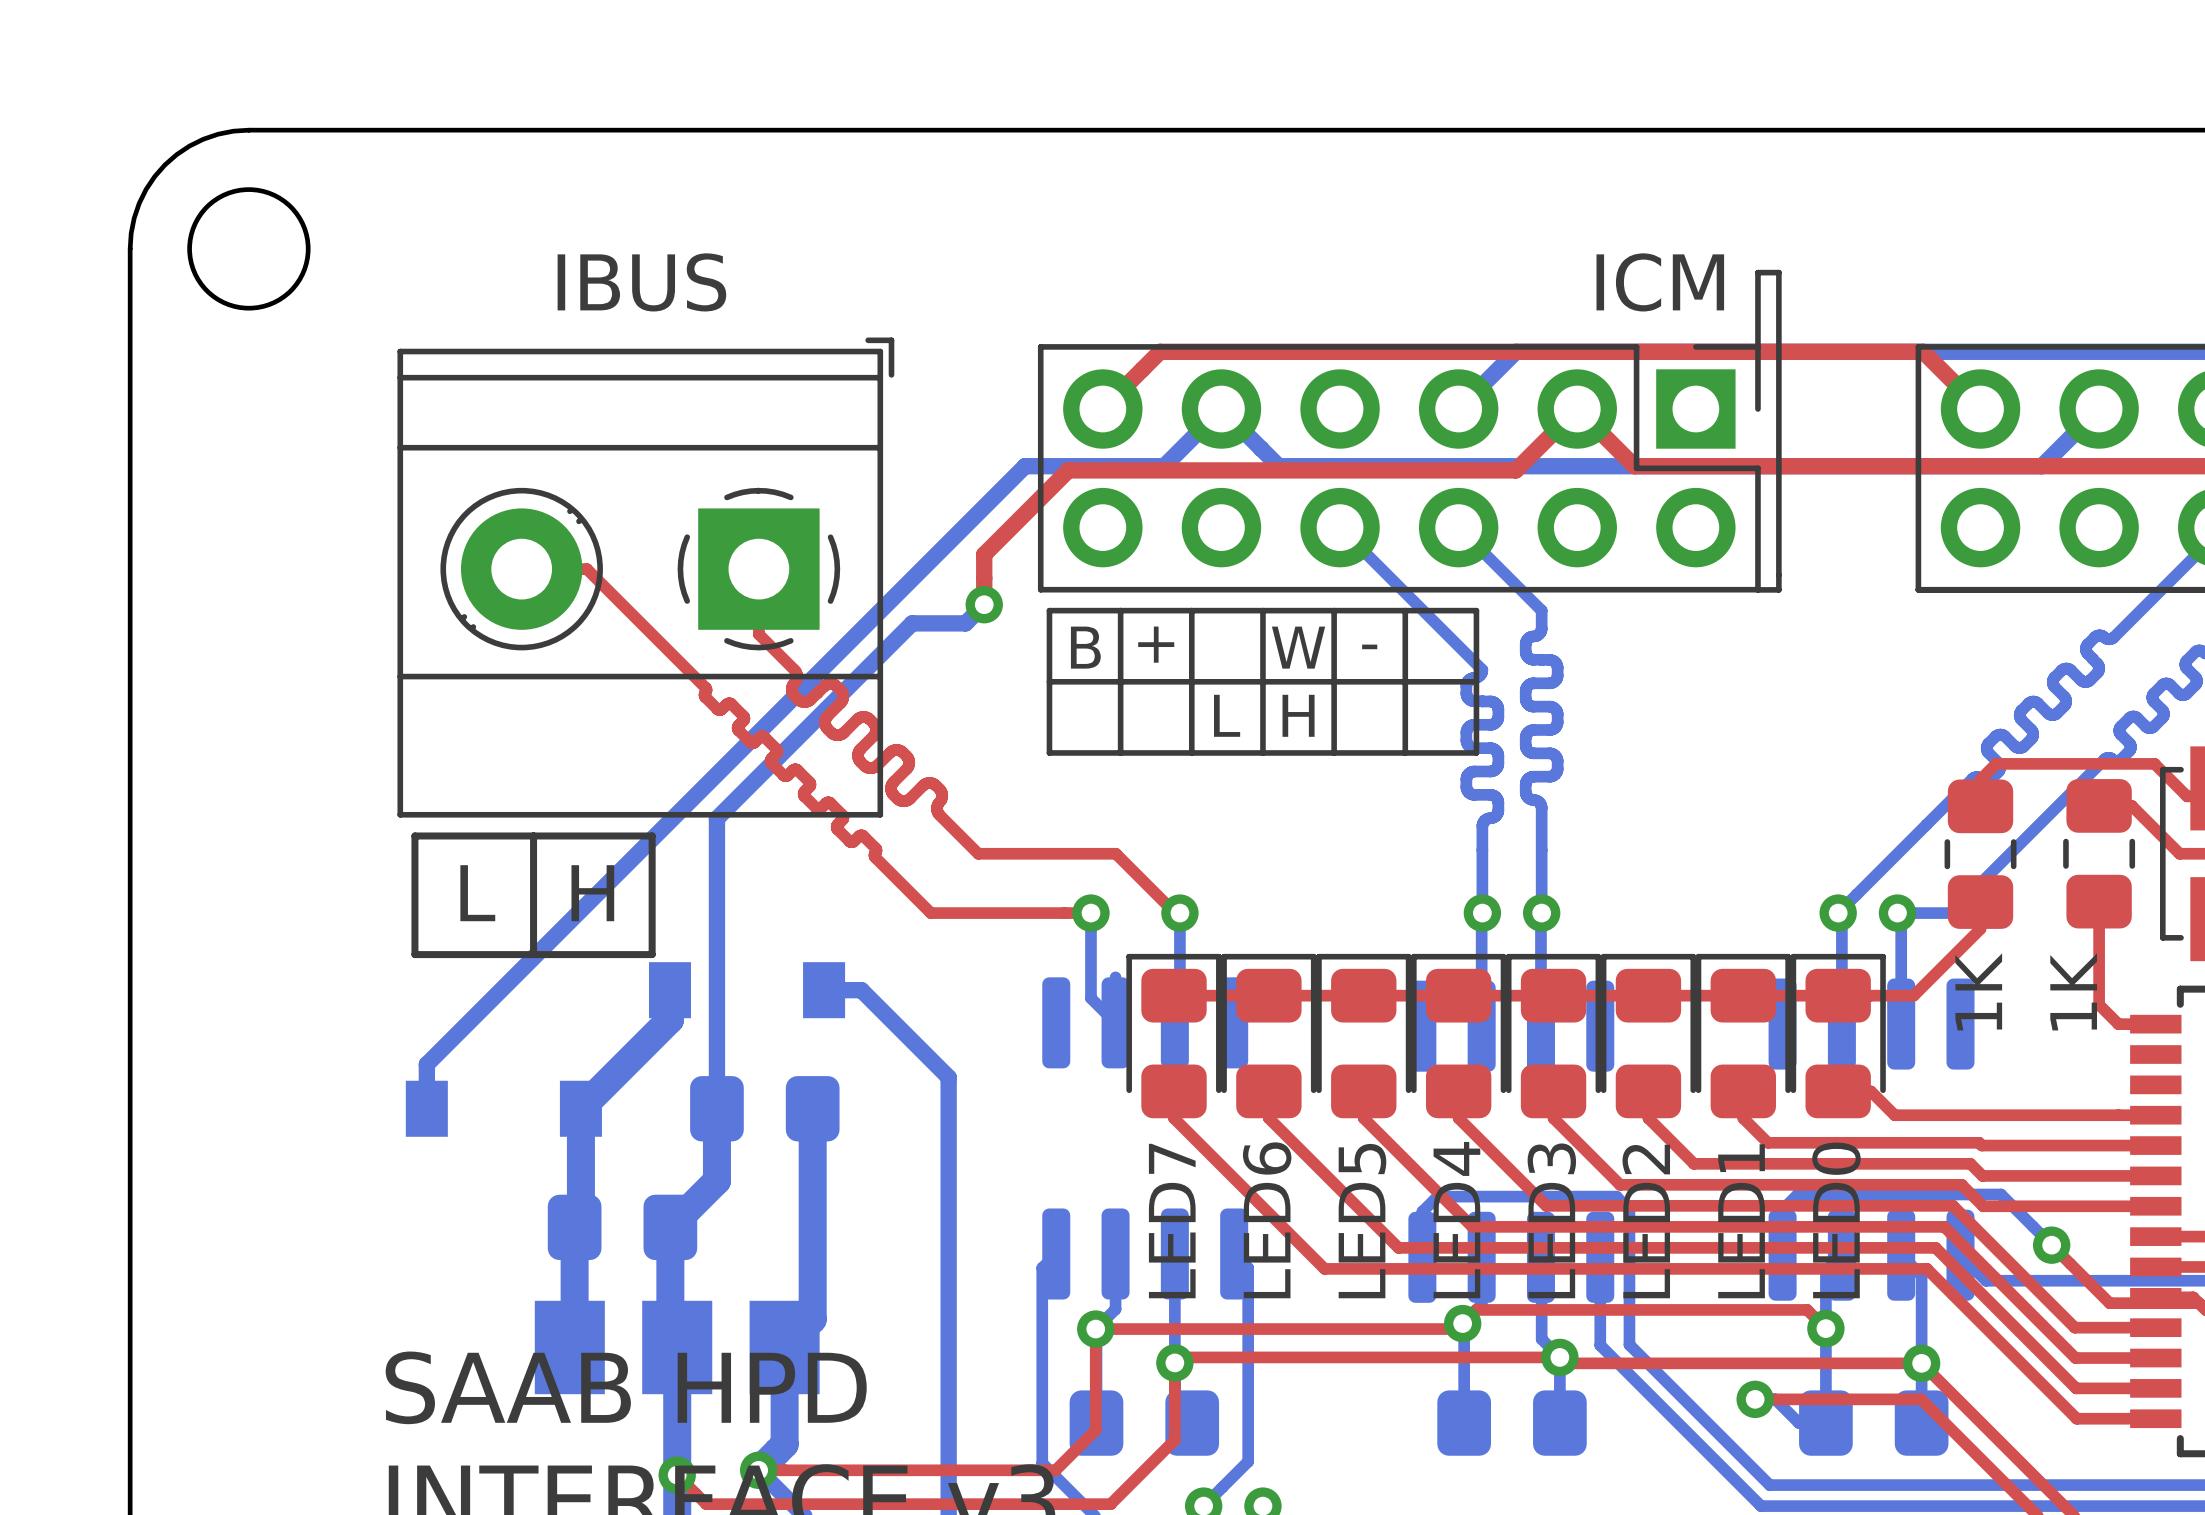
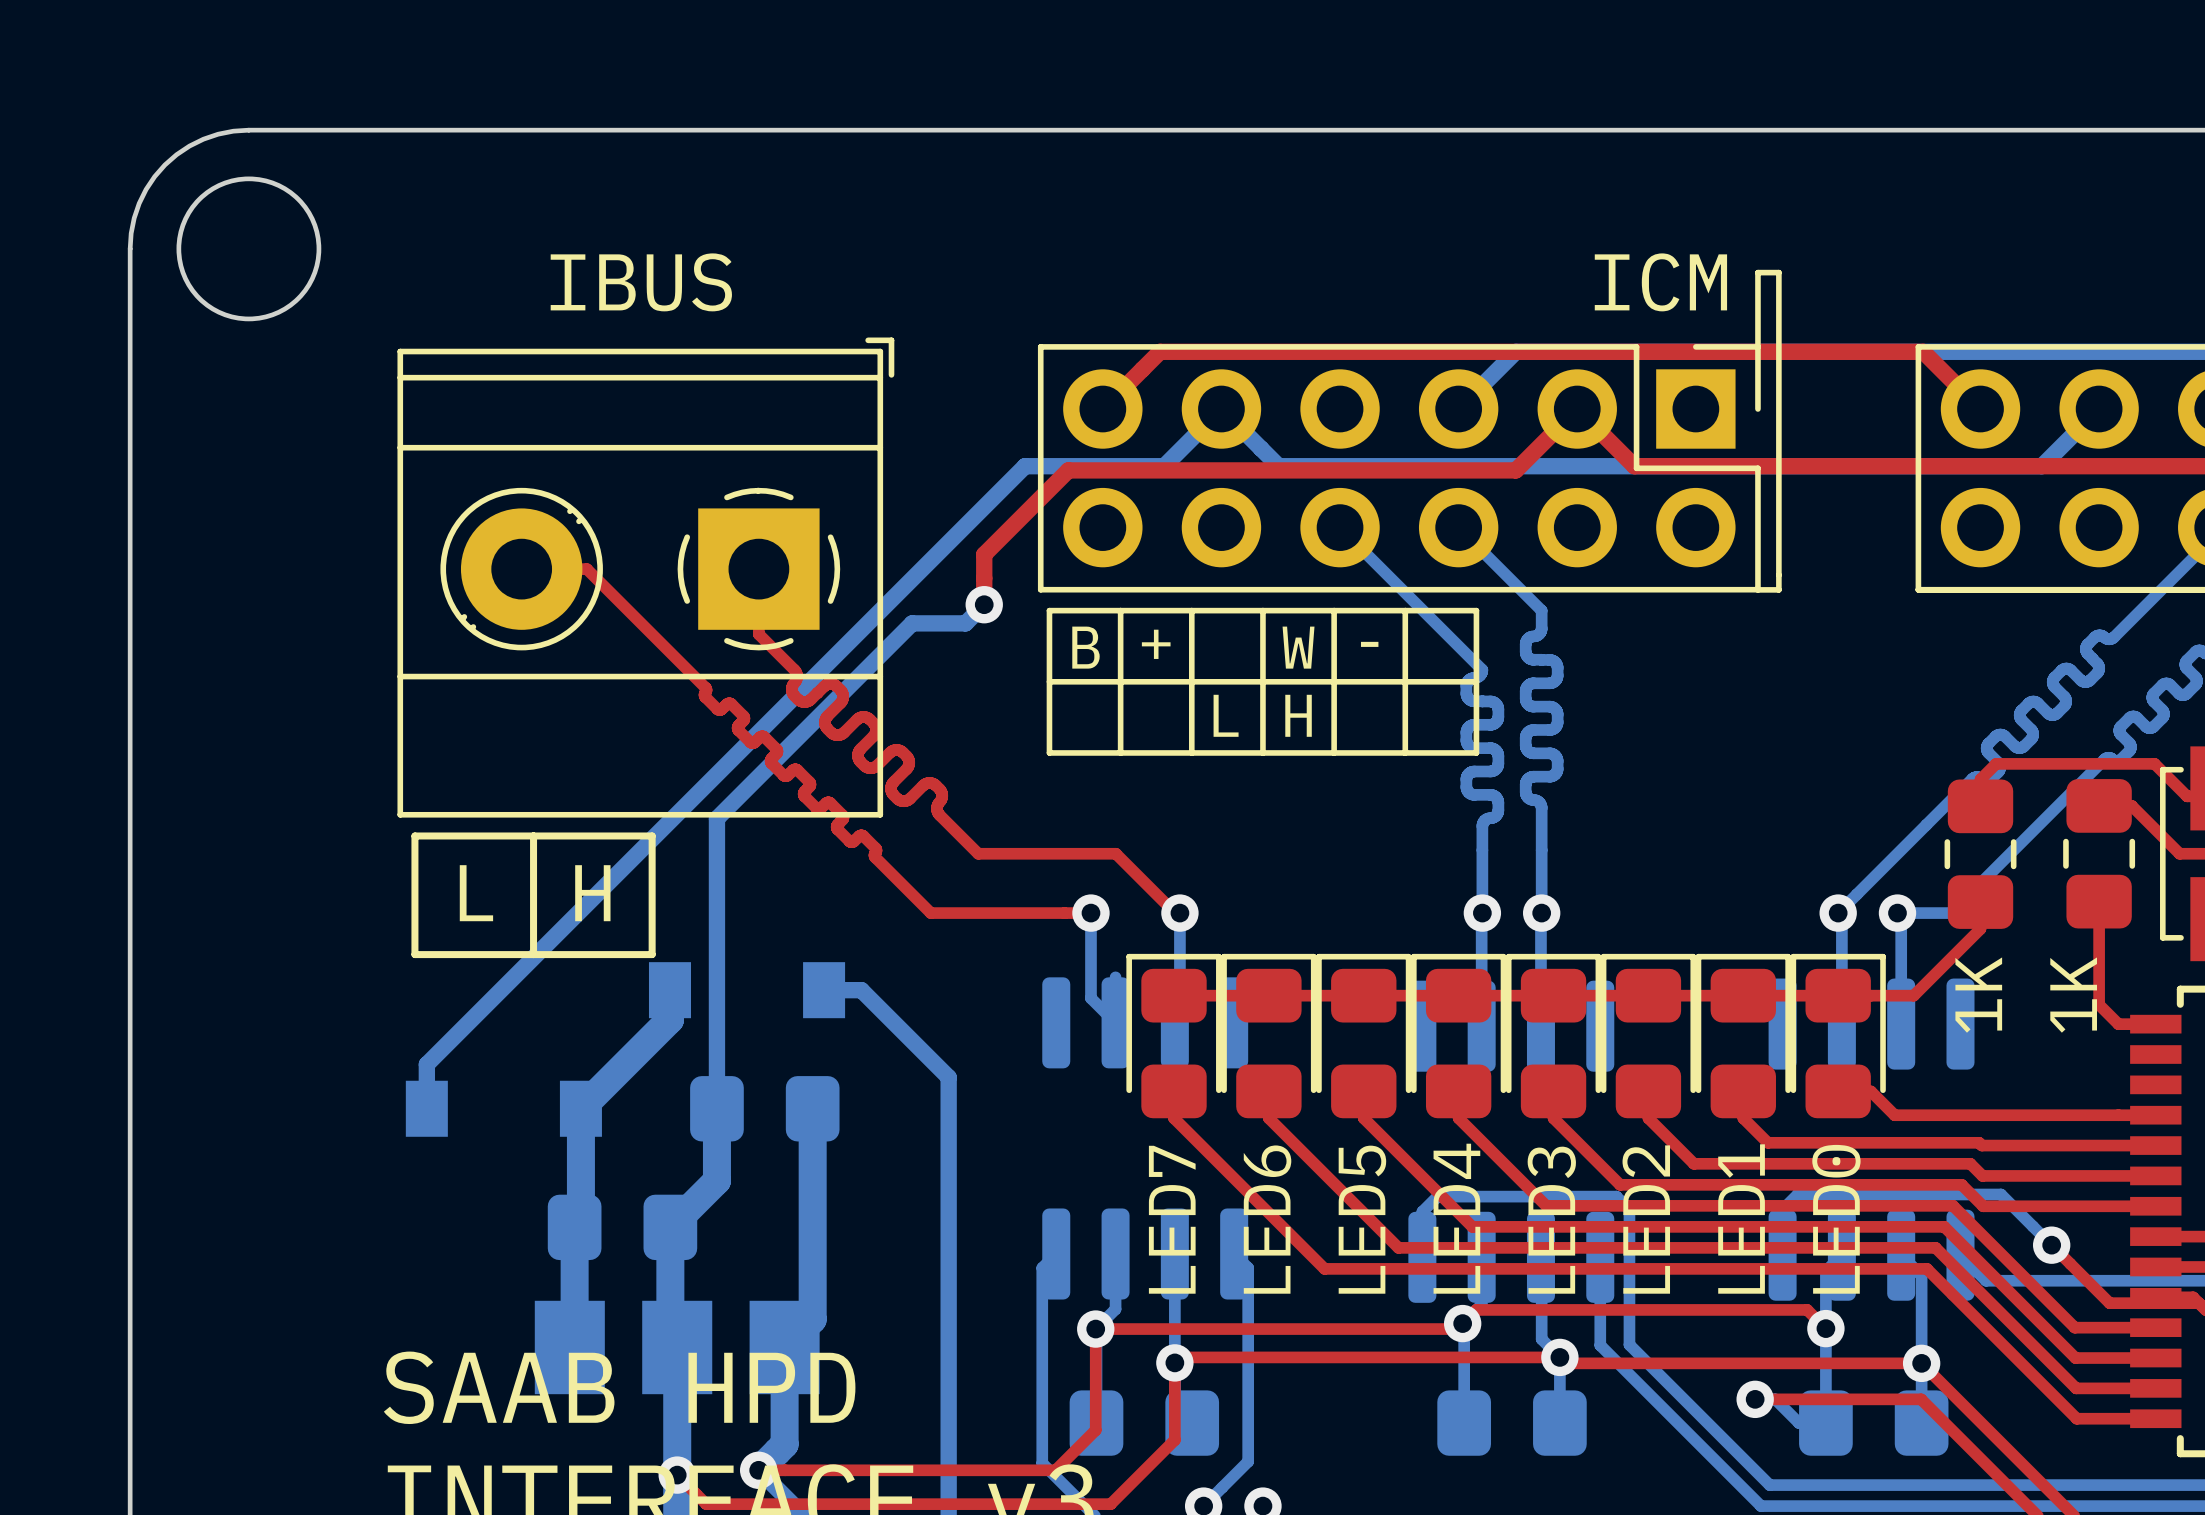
round board edge size: [187, 187, 311, 311] -> [176, 176, 322, 322]

